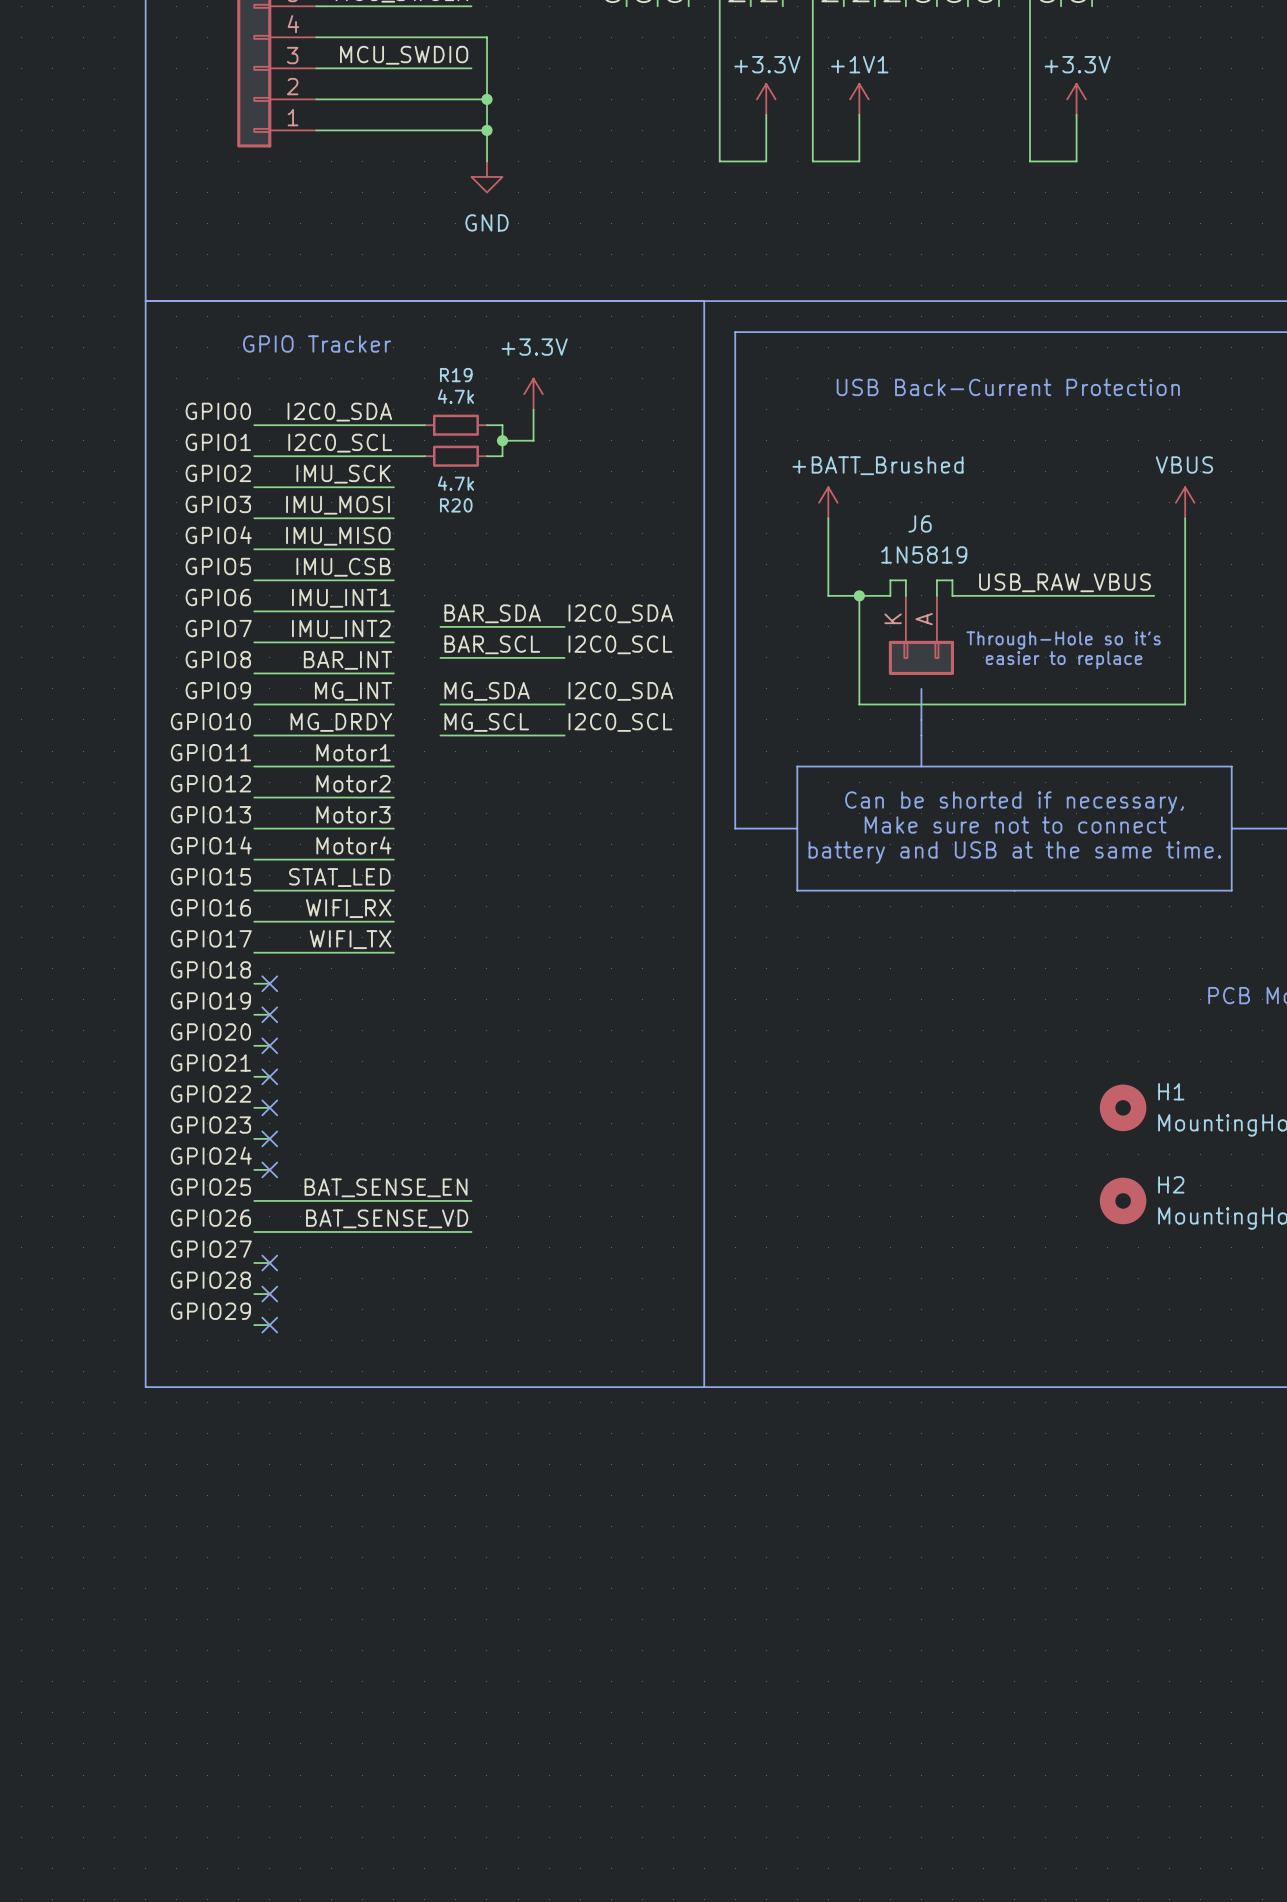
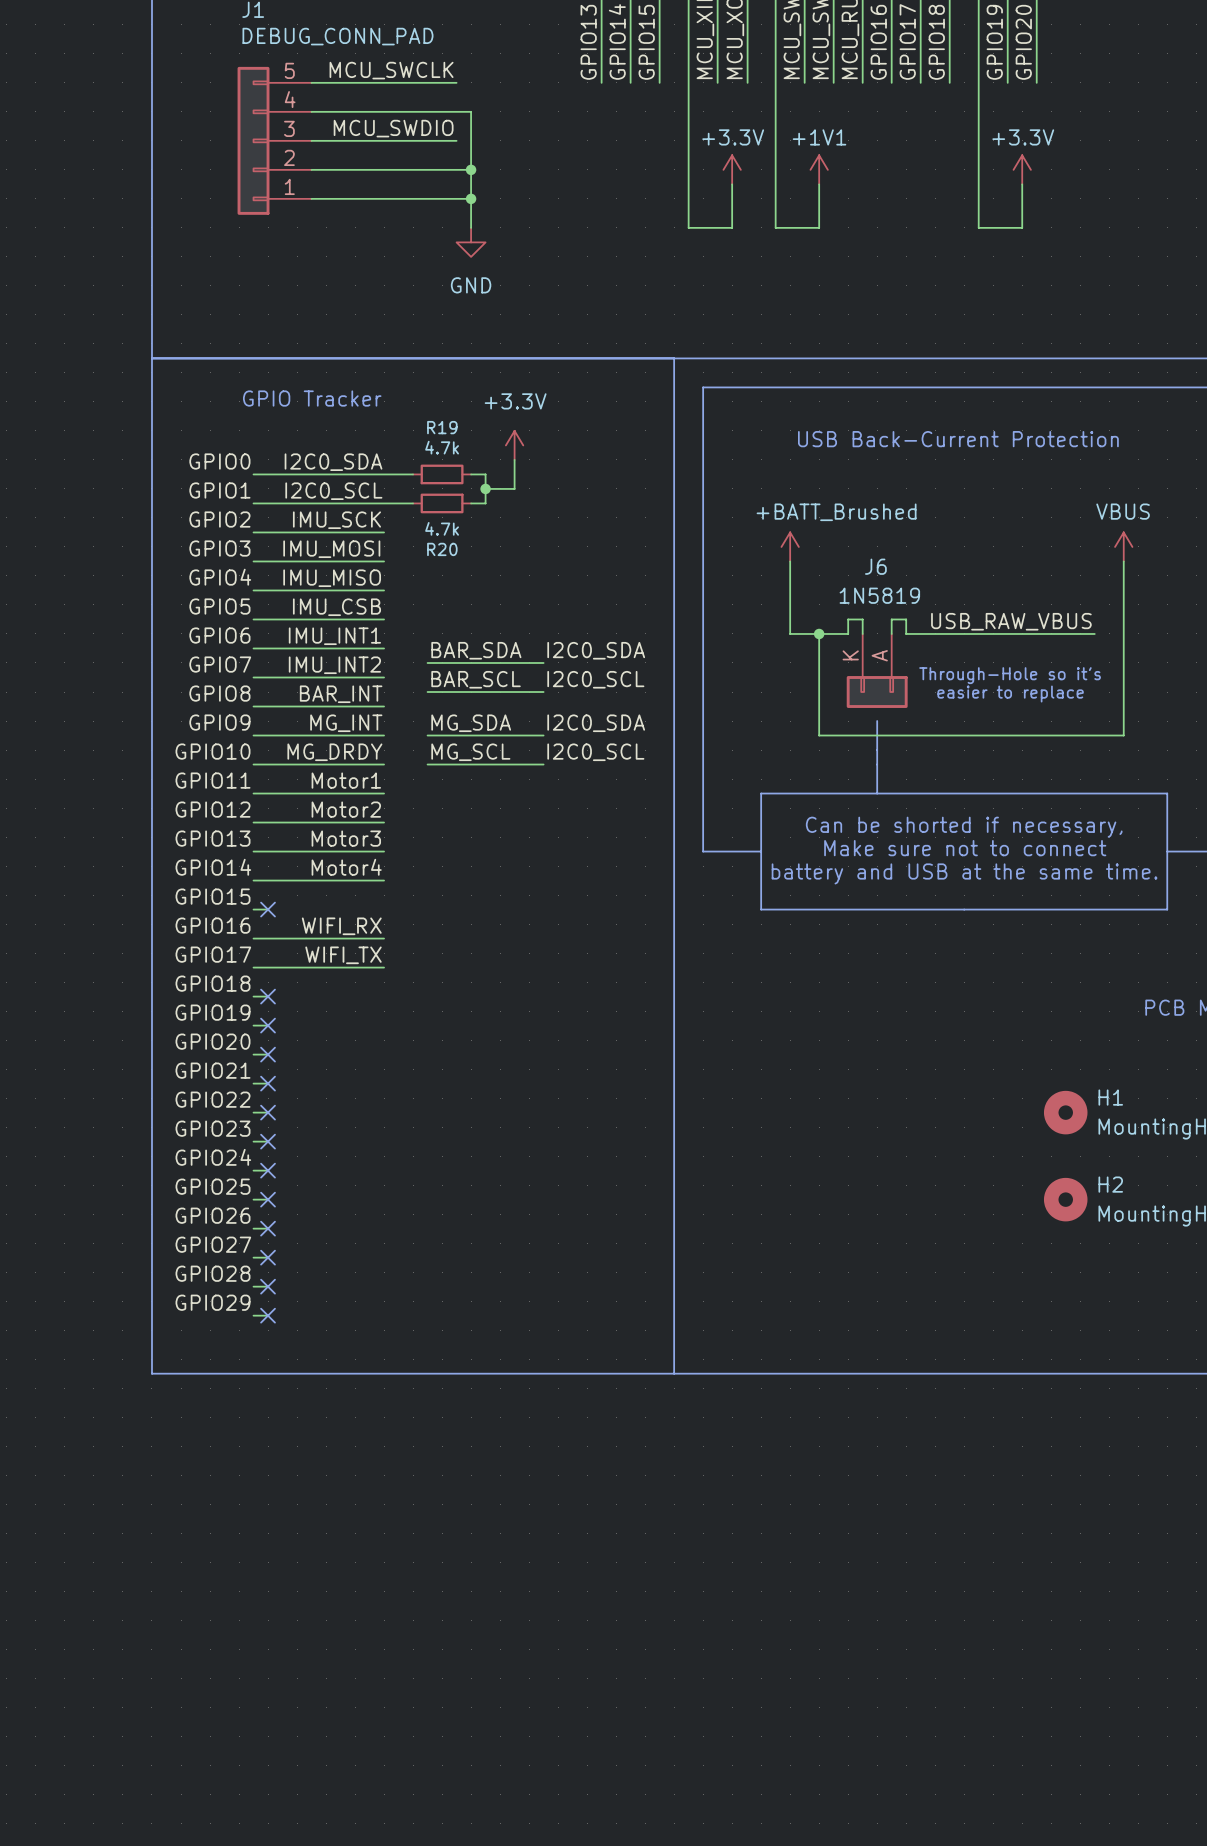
label: STAT_LED (339, 877) -> none
wire: (269, 890) (393, 890) -> none
no-connect mark: none -> (268, 909)
label: BAT_SENSE_EN (386, 1187) -> none
wire: (269, 1200) (471, 1200) -> none
no-connect mark: none -> (268, 1199)
label: BAT_SENSE_VD (387, 1218) -> none
wire: (269, 1231) (471, 1231) -> none
no-connect mark: none -> (268, 1228)

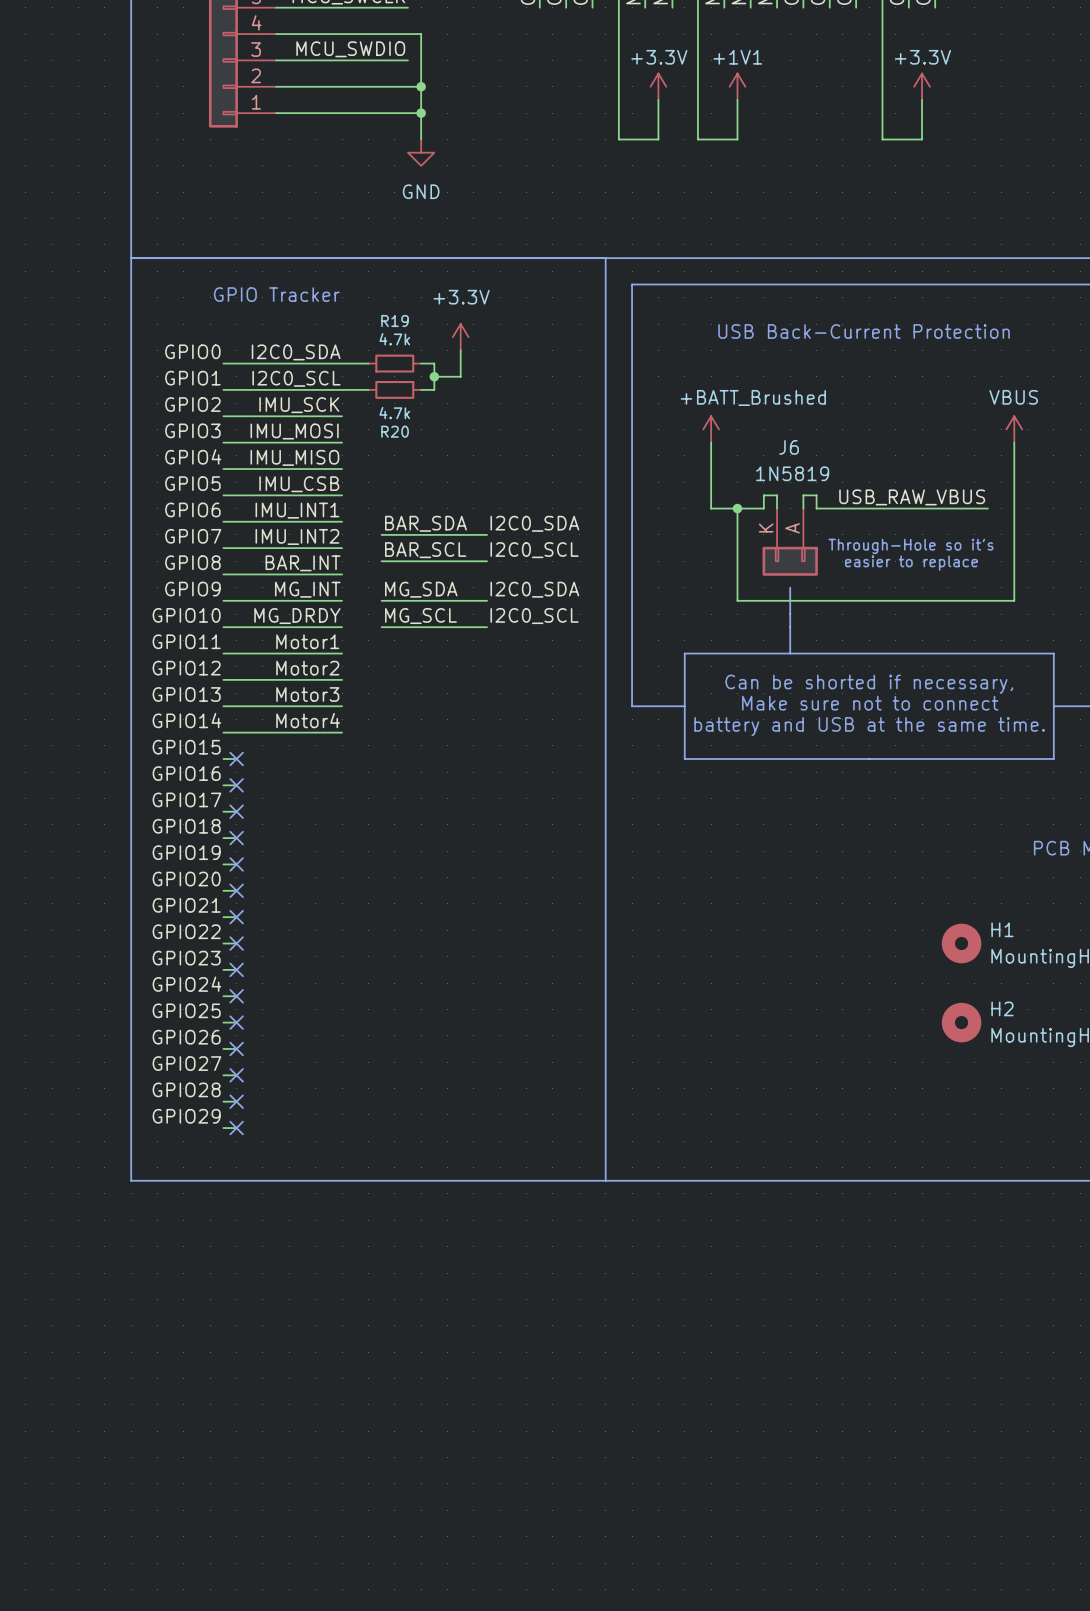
label: WIFI_RX (341, 926) -> none
wire: (268, 938) (384, 938) -> none
no-connect mark: none -> (236, 785)
label: WIFI_TX (343, 955) -> none
wire: (268, 967) (384, 967) -> none
no-connect mark: none -> (236, 811)

